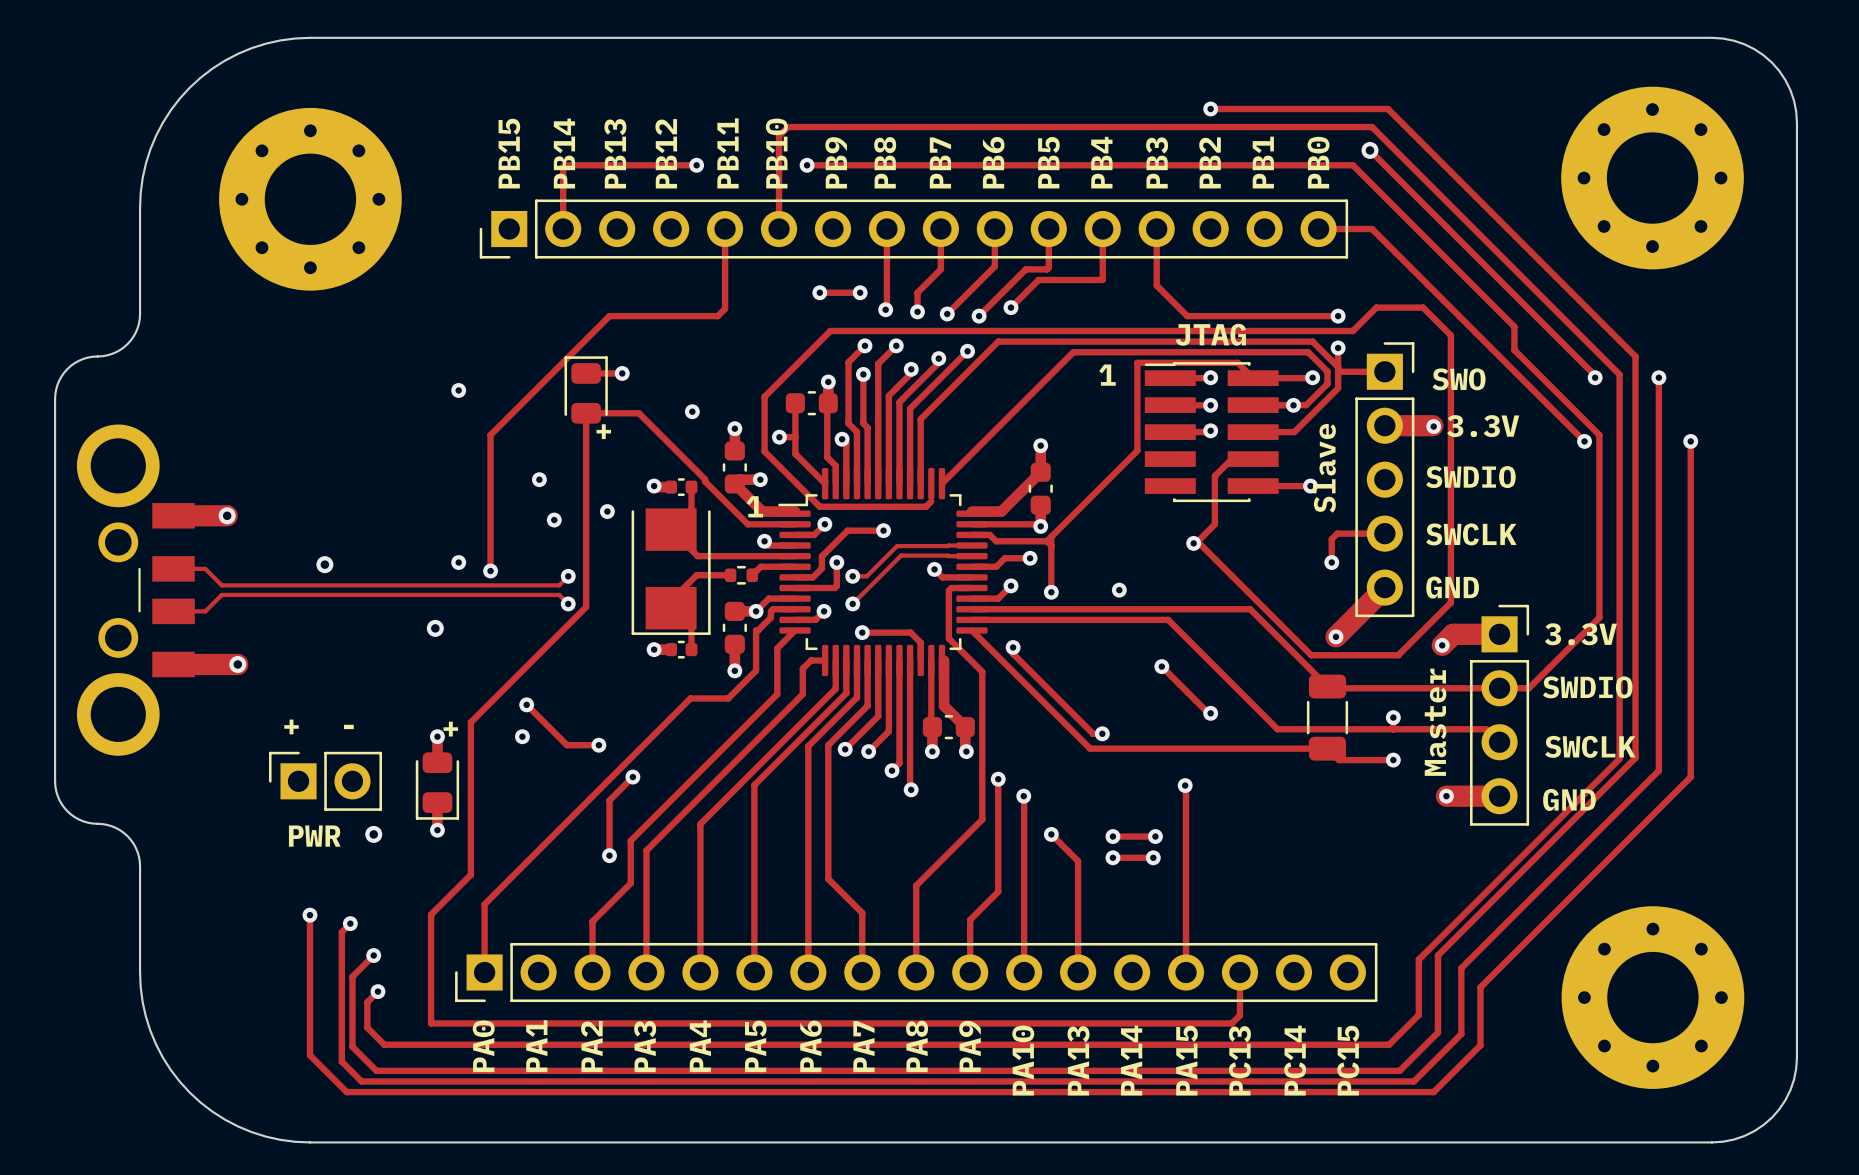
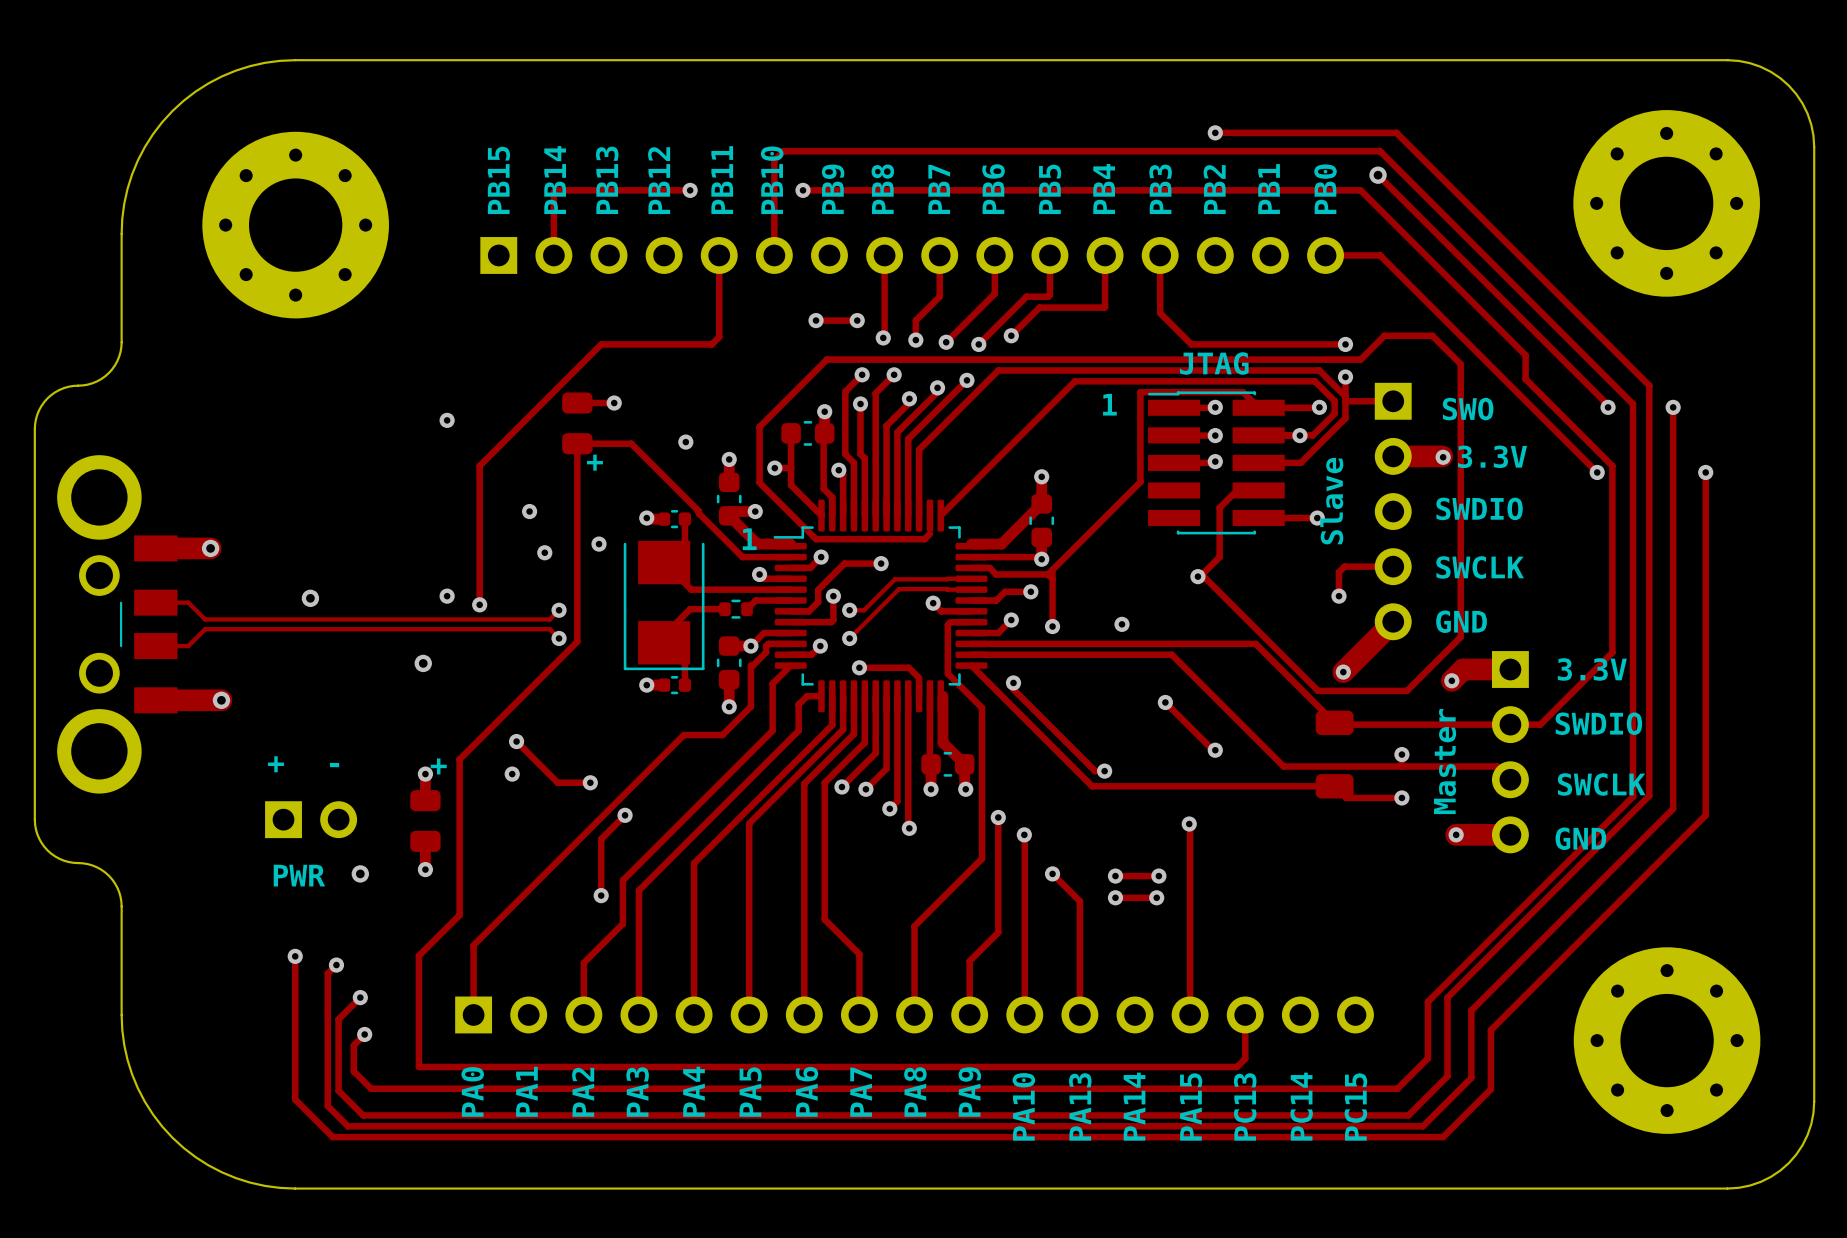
part footprint: [479, 199, 1349, 259] -> [480, 237, 1344, 274]
part footprint: [1355, 342, 1415, 618] -> [1374, 382, 1412, 641]
part footprint: [564, 356, 608, 424] -> [562, 392, 593, 455]
part footprint: [1470, 604, 1530, 826] -> [1491, 651, 1529, 854]
part footprint: [1306, 674, 1349, 761] -> [1315, 710, 1354, 799]
part footprint: [269, 751, 383, 811] -> [265, 801, 358, 839]
part footprint: [415, 752, 460, 820] -> [410, 790, 441, 852]
part footprint: [455, 942, 1378, 1003] -> [455, 996, 1374, 1034]

